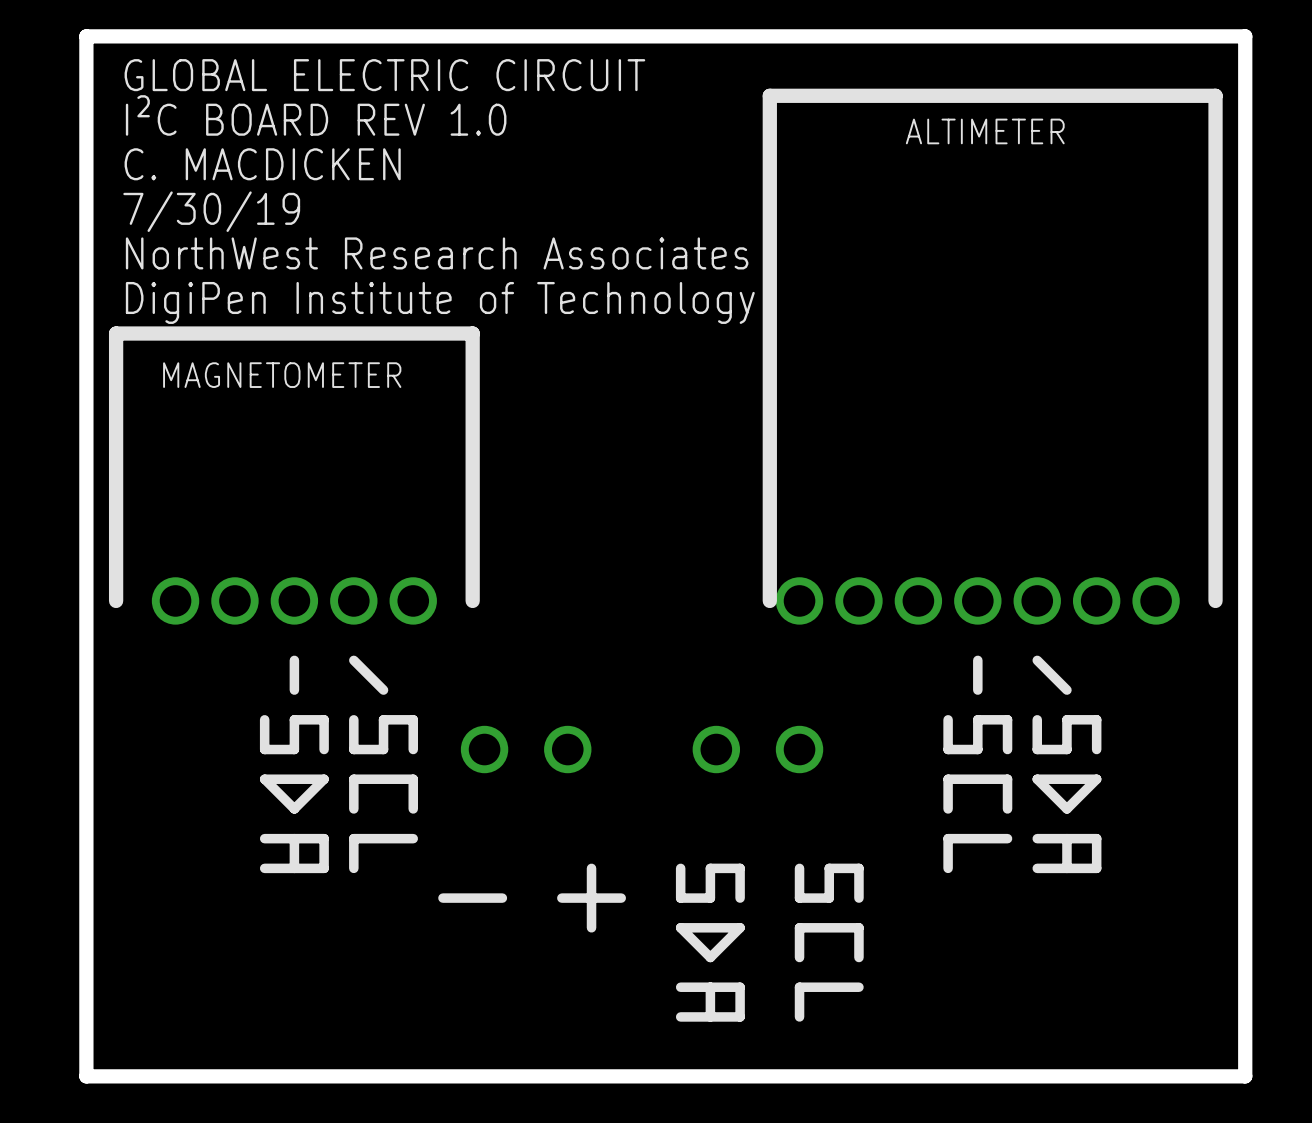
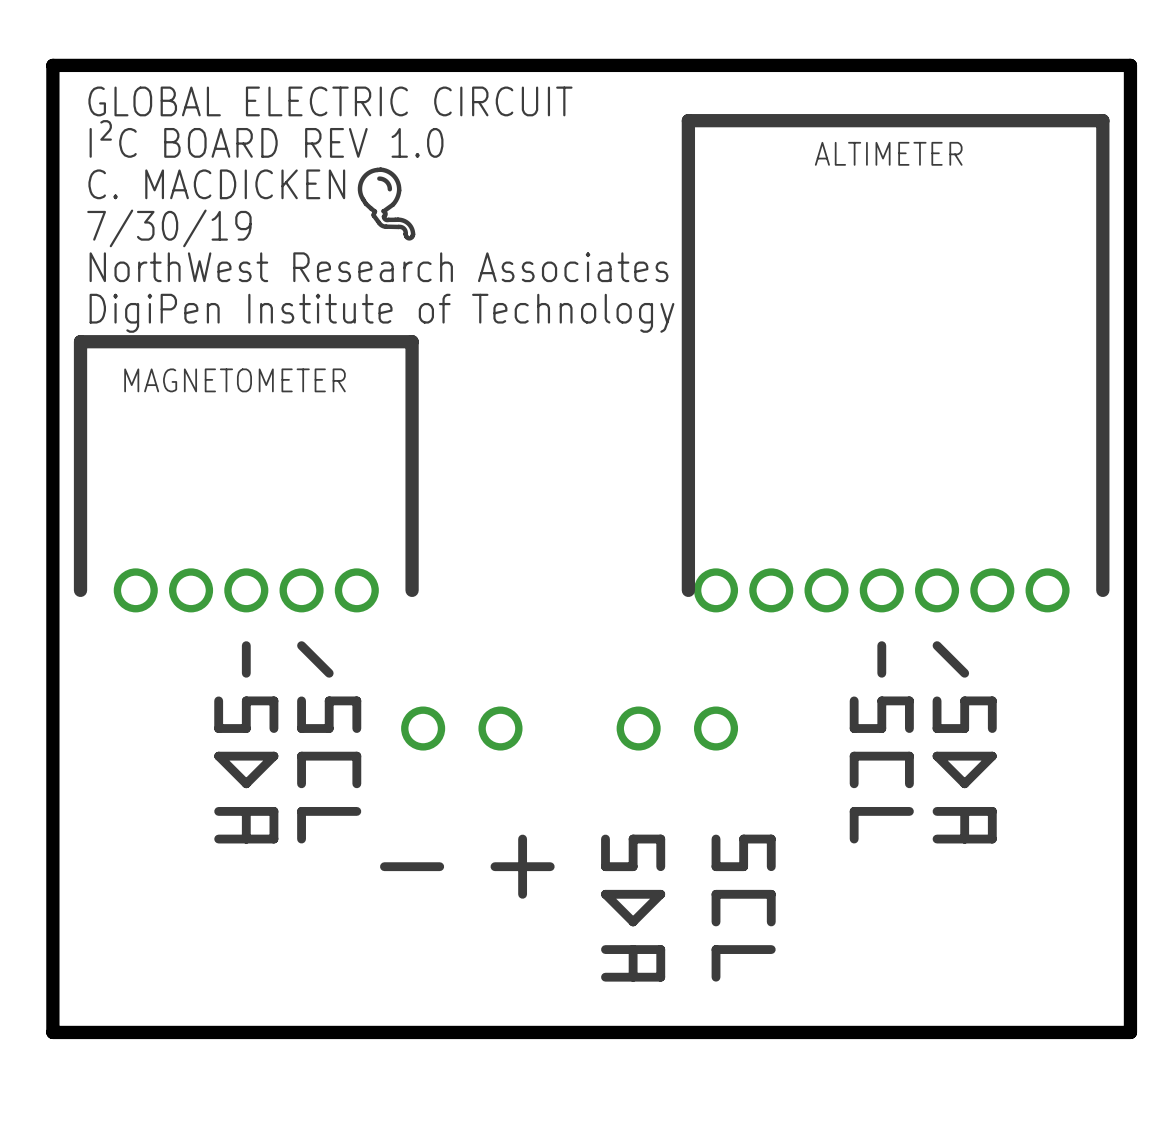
drawing: none -> [357, 167, 416, 241]

